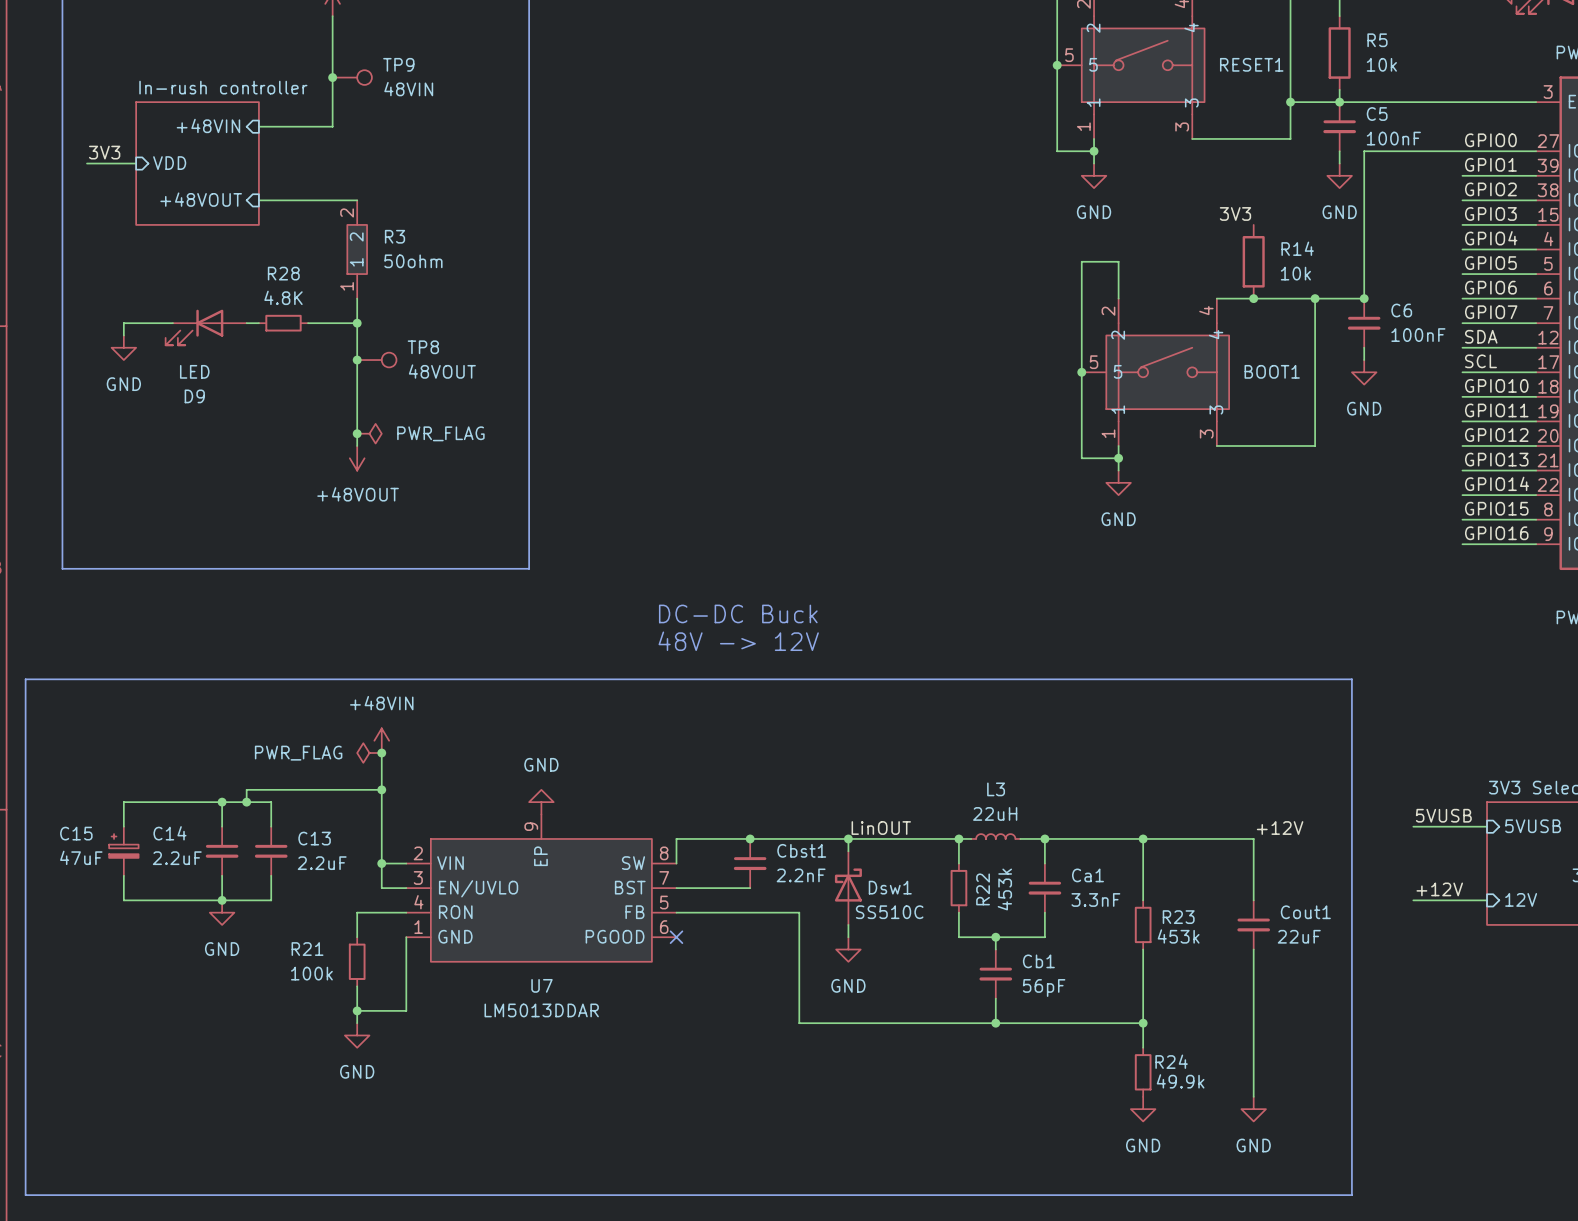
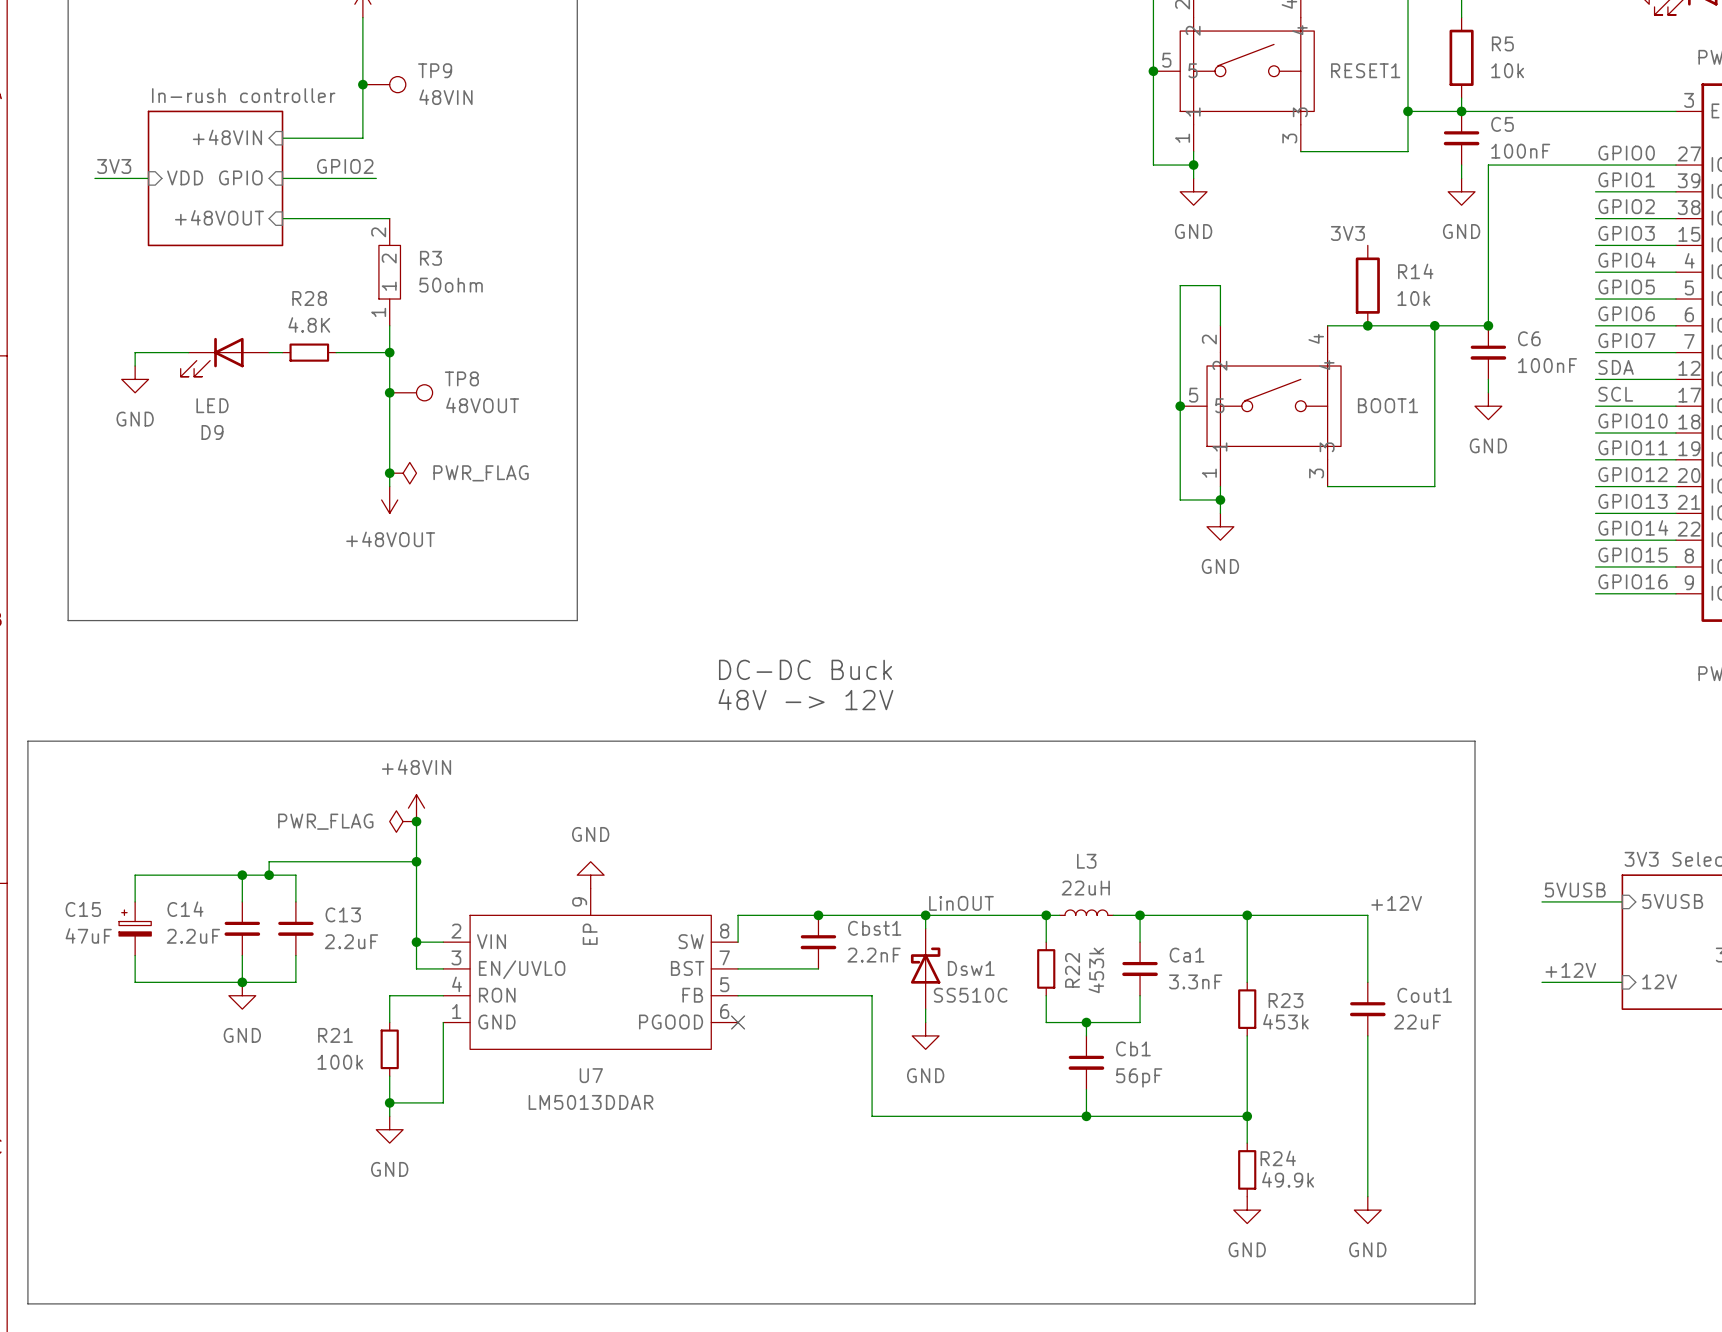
label: none -> GPIO2 (345, 166)
sheet pin: none -> GPIO (240, 177)
wire: none -> (282, 178) (376, 178)

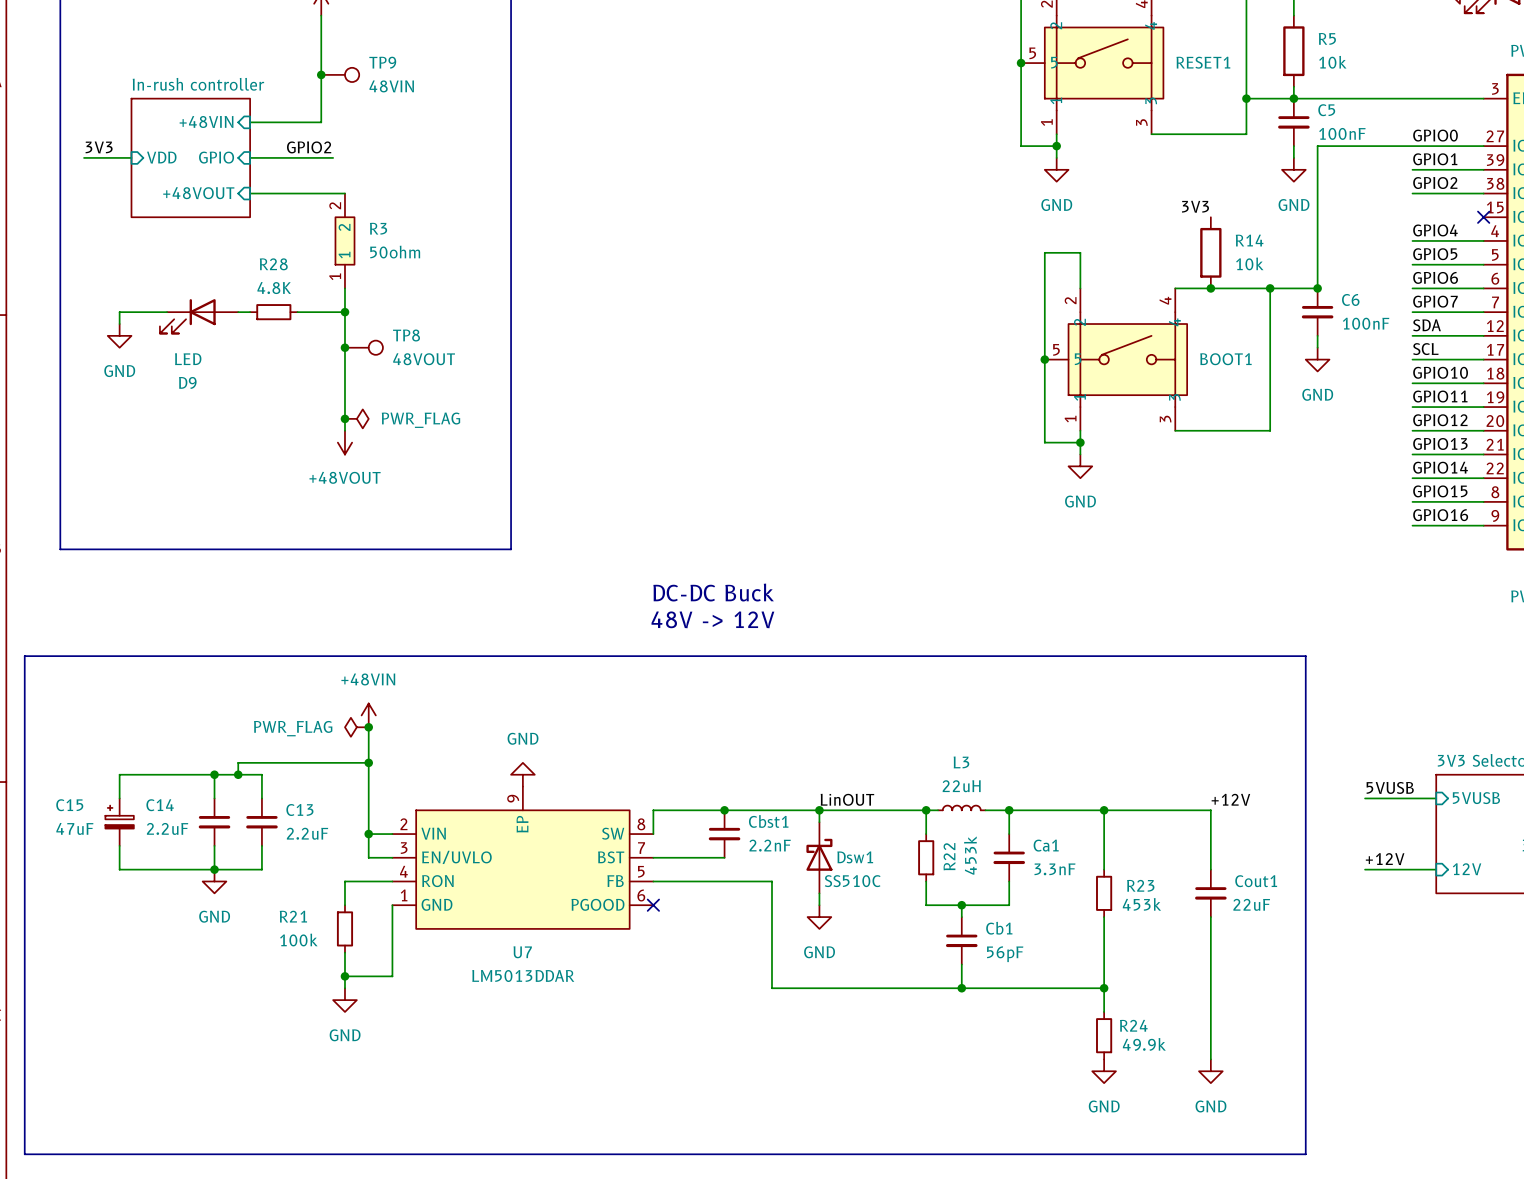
label: GPIO3 (1626, 233) -> none
wire: (1595, 245) (1675, 245) -> none
no-connect mark: none -> (1483, 217)

